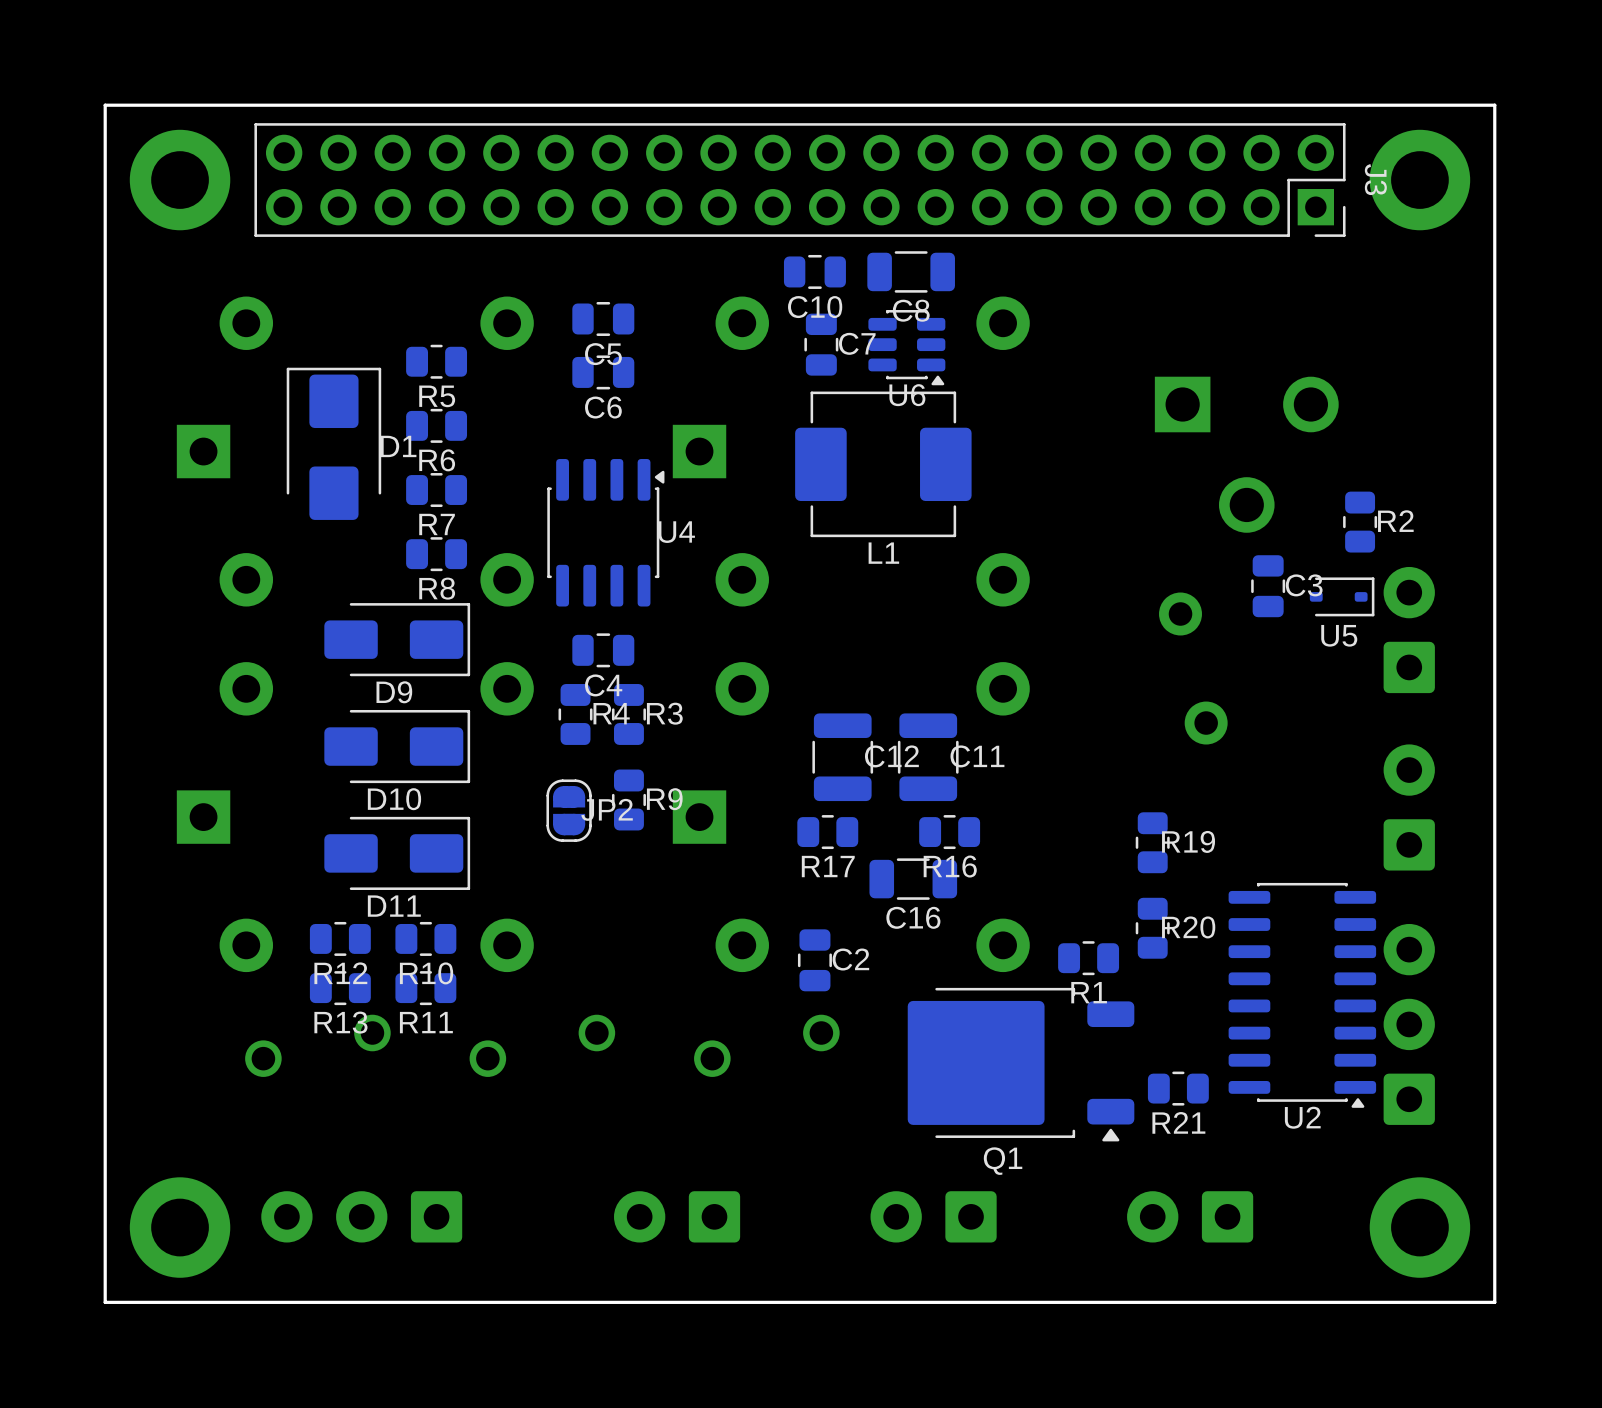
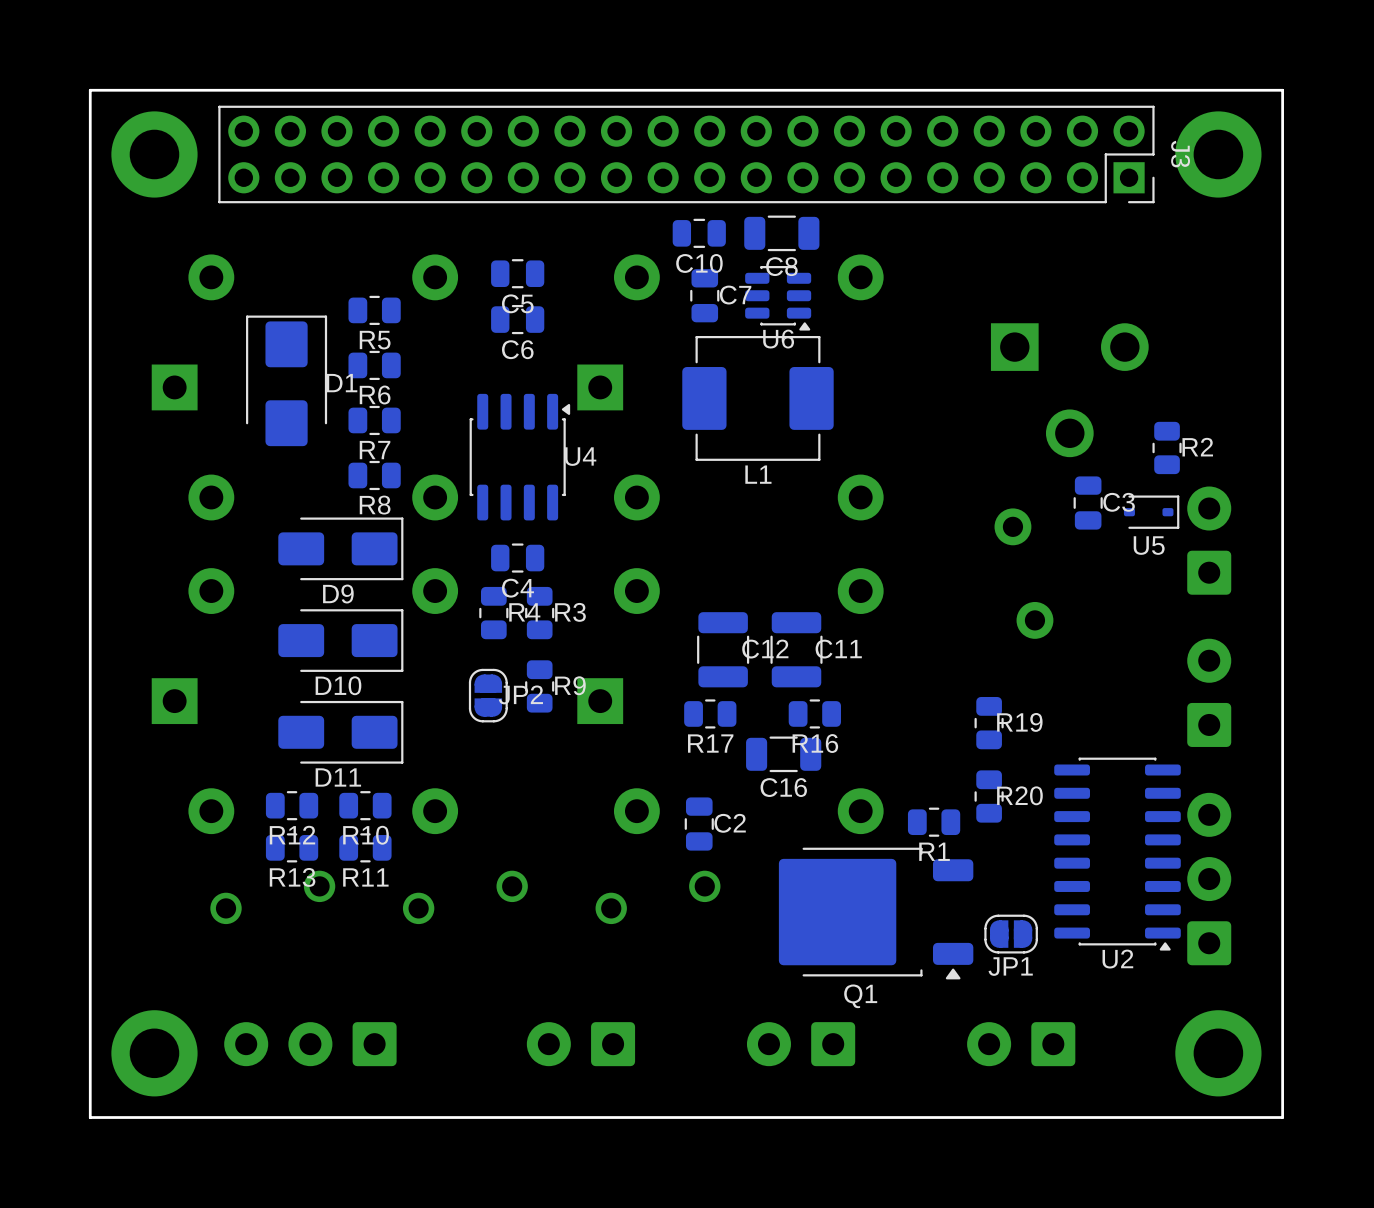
R21: (1178, 1088) -> none
JP1: none -> (1011, 934)

